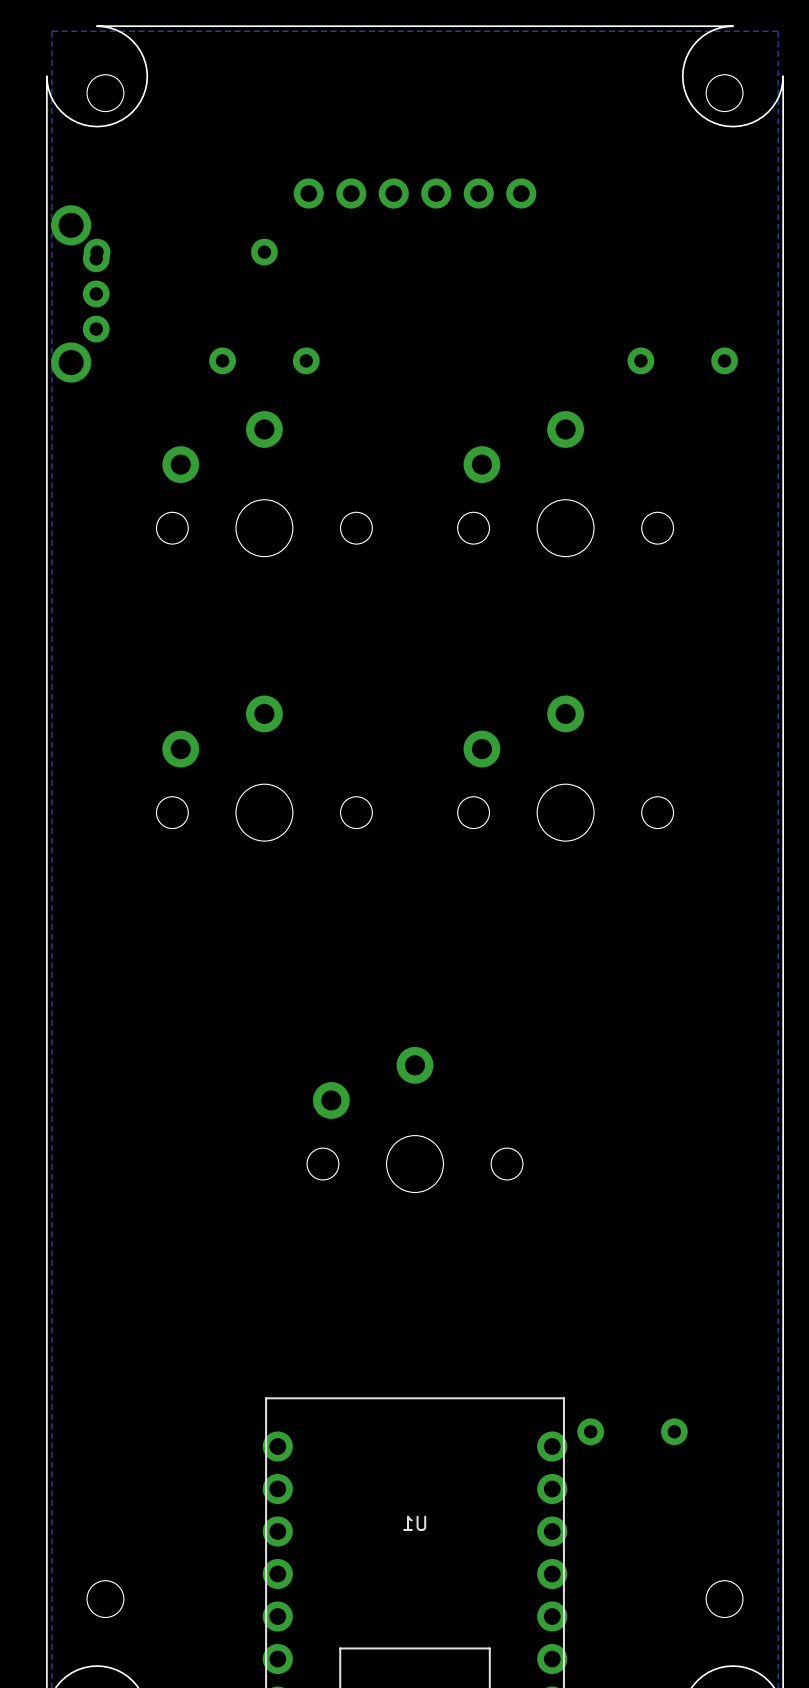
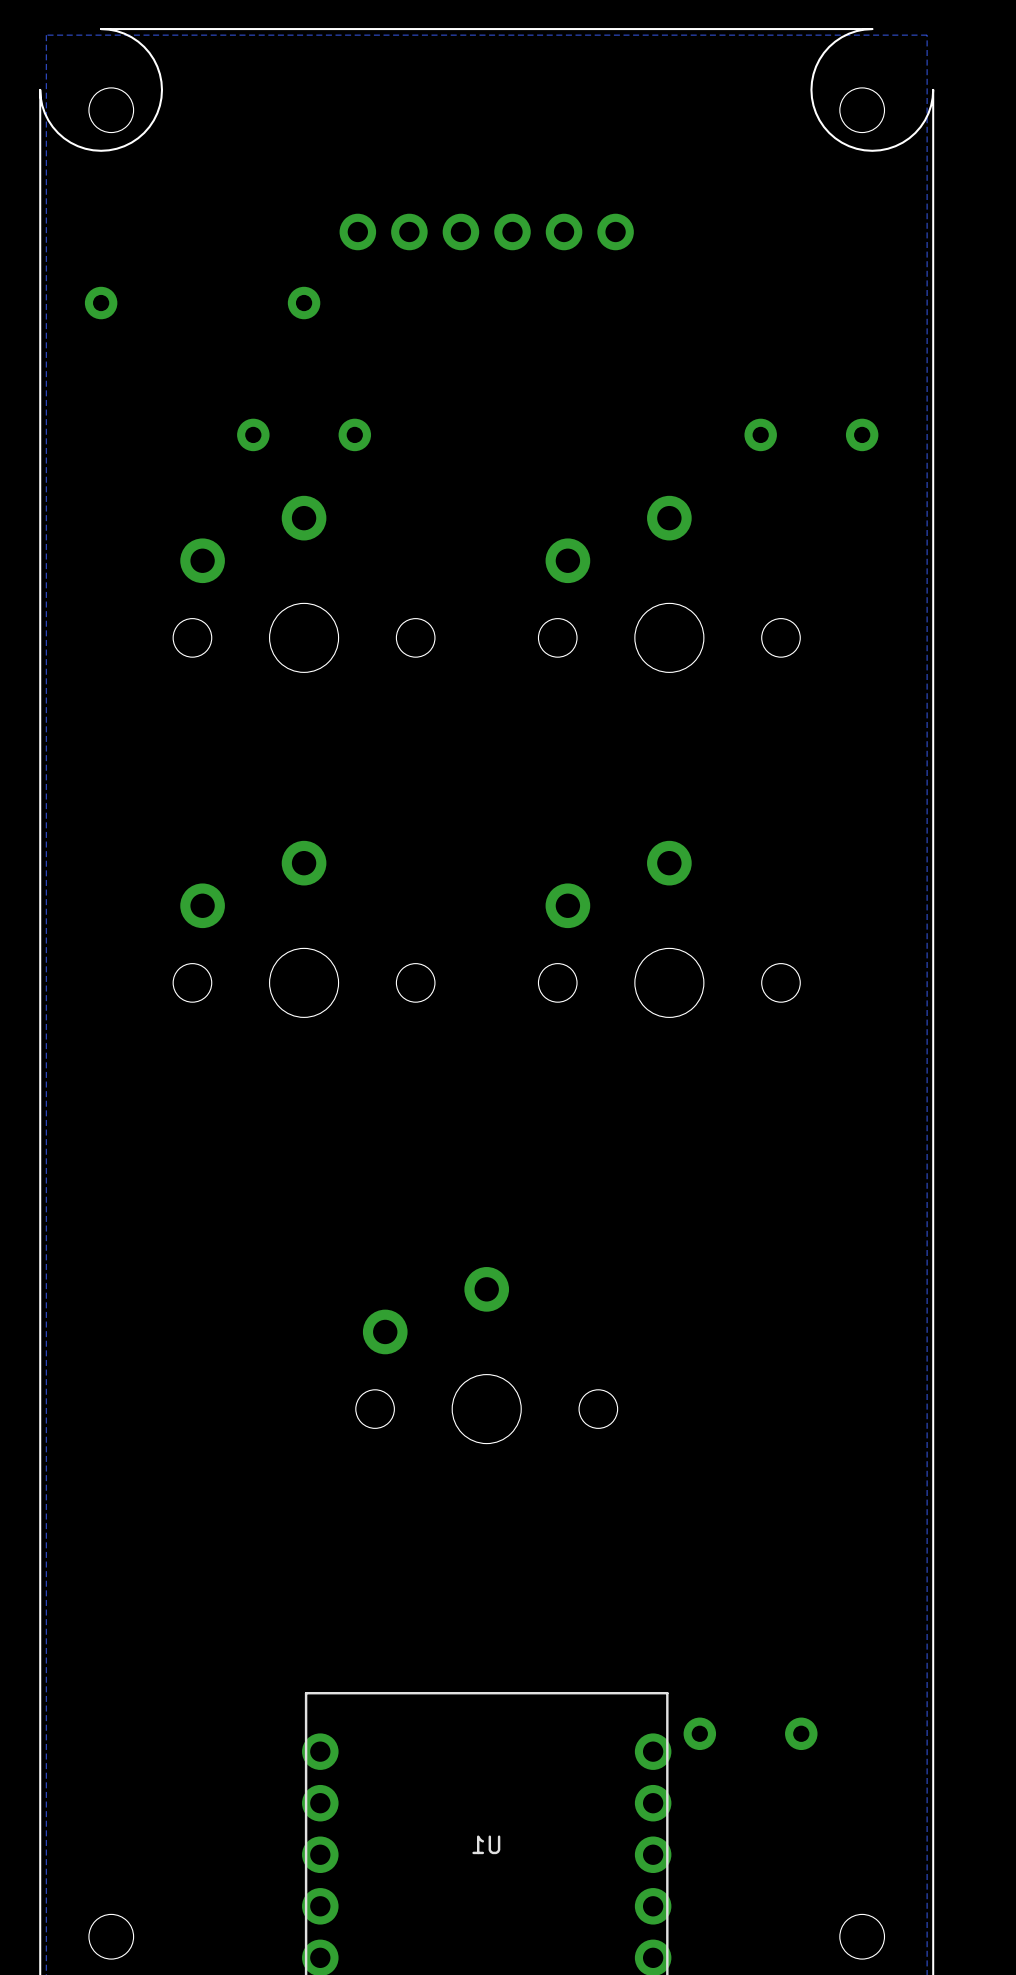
part: (80, 293) -> none

